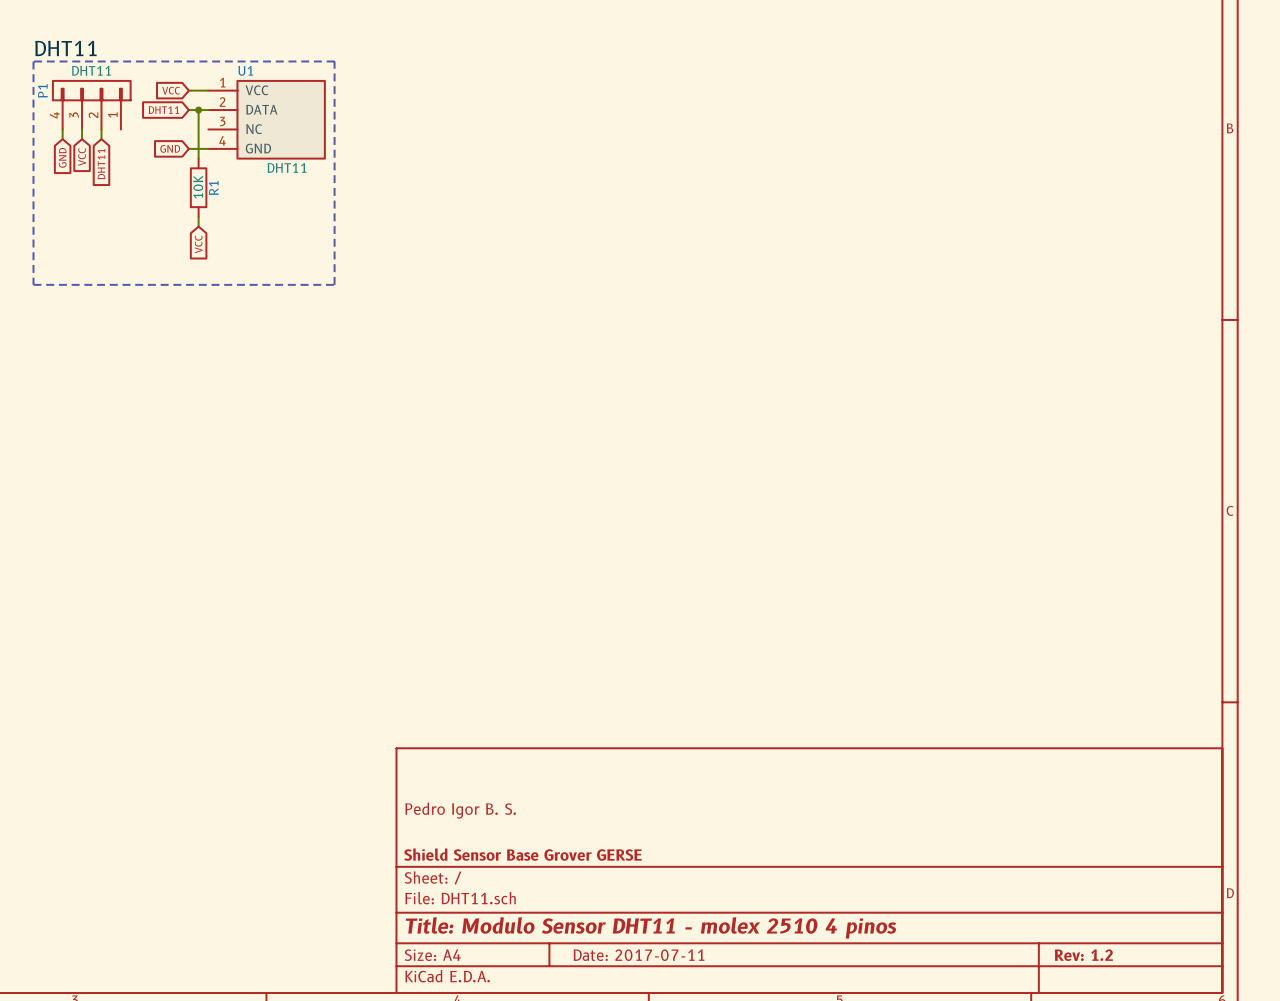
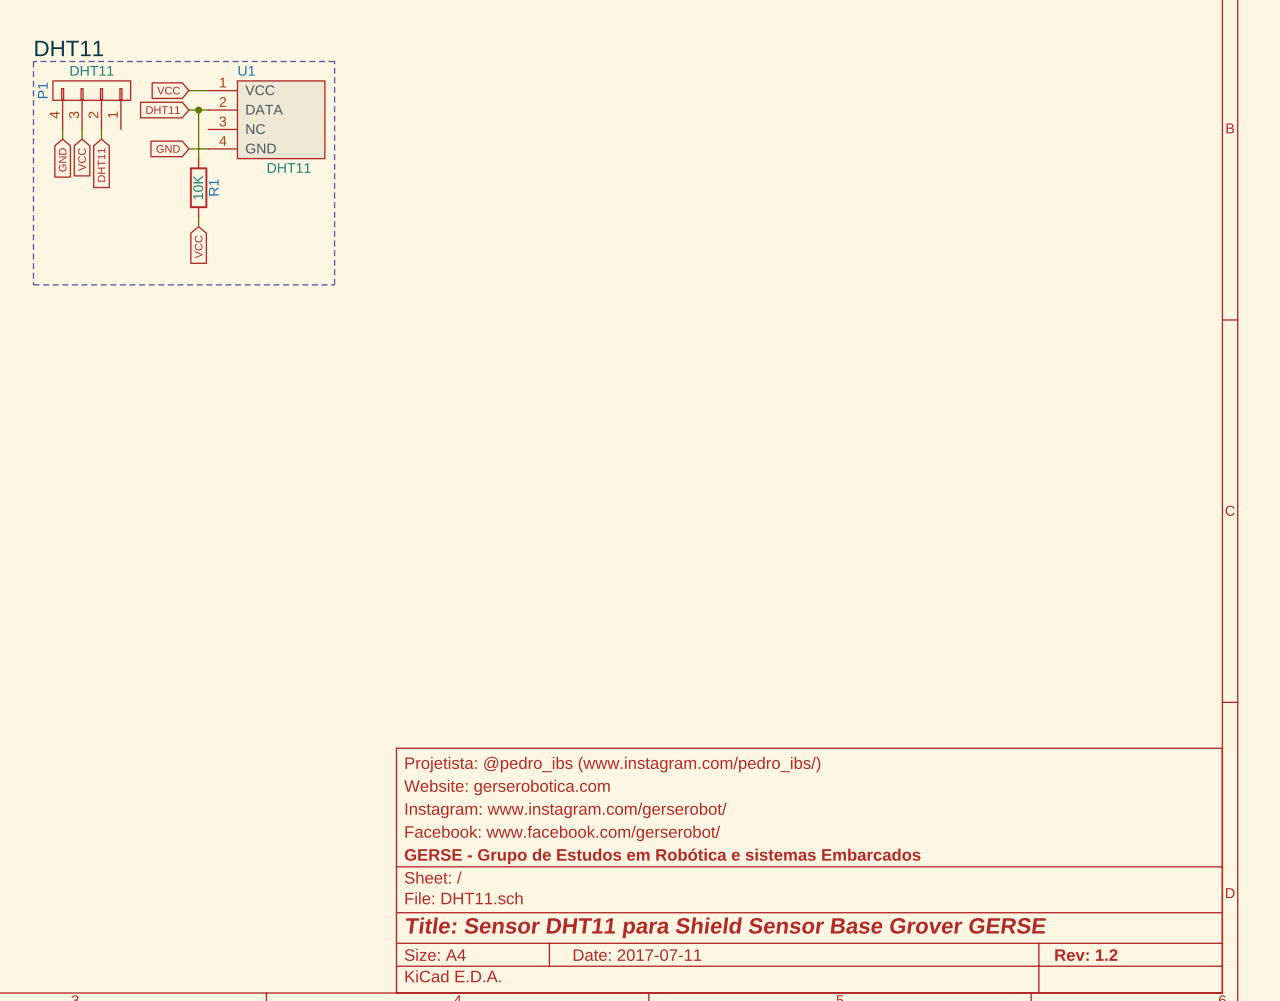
title block: none -> Projetista: @pedro_ibs (www.instagram.com/pedro_ibs/) (612, 764)
title block: none -> Website: gerserobotica.com (506, 787)
title block: Pedro Igor B. S. (460, 810) -> Instagram: www.instagram.com/gerserobot/ (566, 810)
title block: none -> Facebook: www.facebook.com/gerserobot/ (562, 833)
title block: Shield Sensor Base Grover GERSE (523, 854) -> GERSE - Grupo de Estudos em Robótica e sistemas Embarcados (662, 856)
title block: Title: Modulo Sensor DHT11 - molex 2510 4 pinos (650, 927) -> Title: Sensor DHT11 para Shield Sensor Base Grover GERSE (725, 927)

